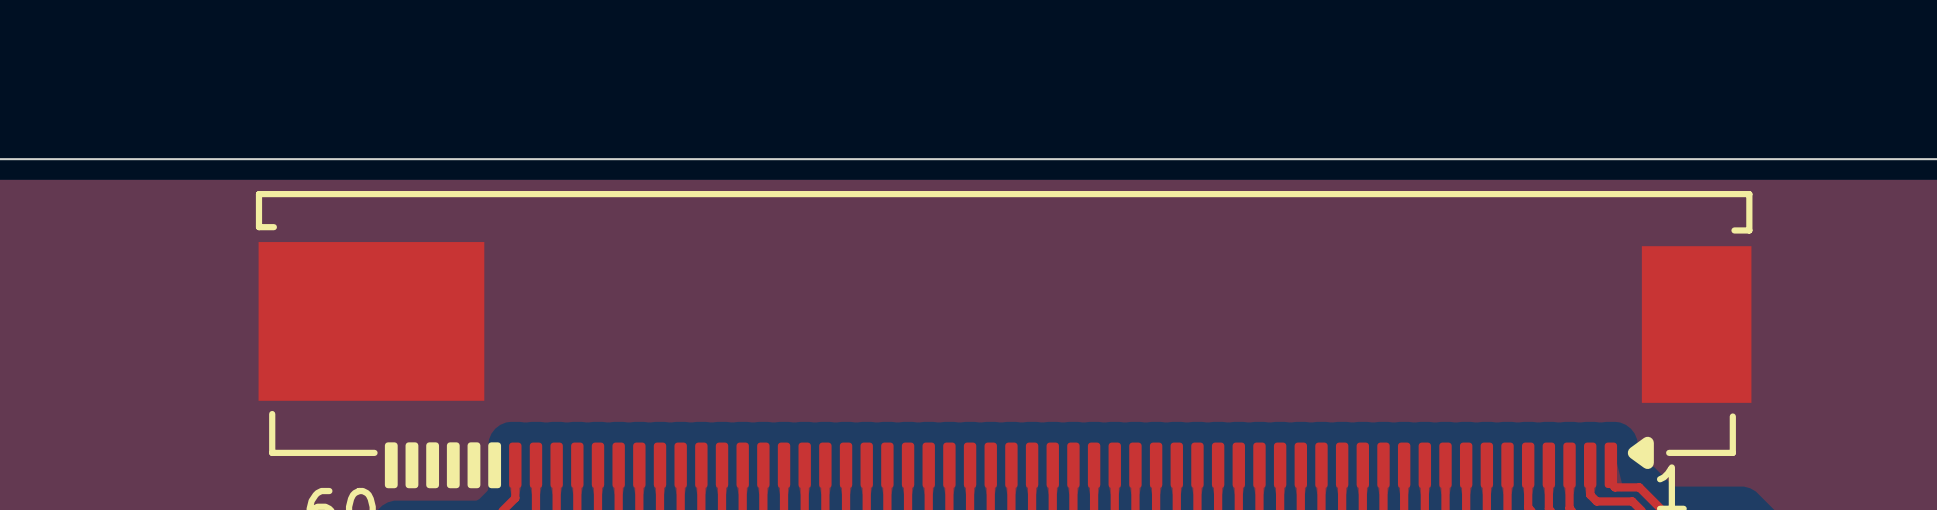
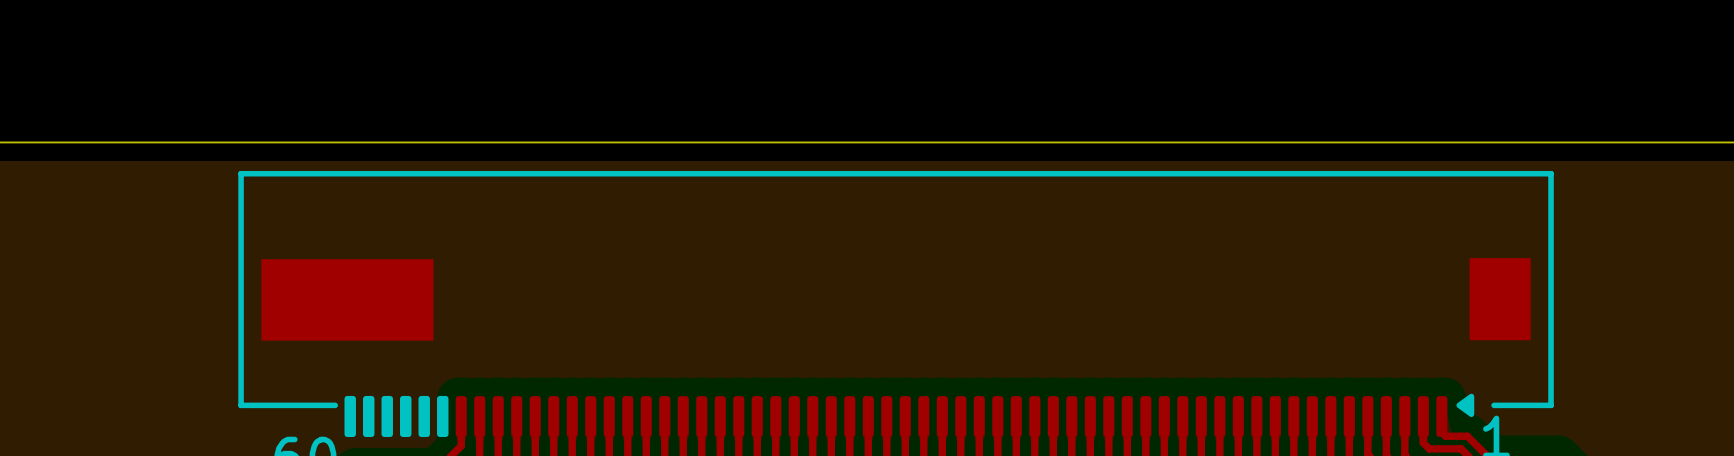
part footprint: [255, 190, 1753, 489] -> [238, 170, 1554, 438]

